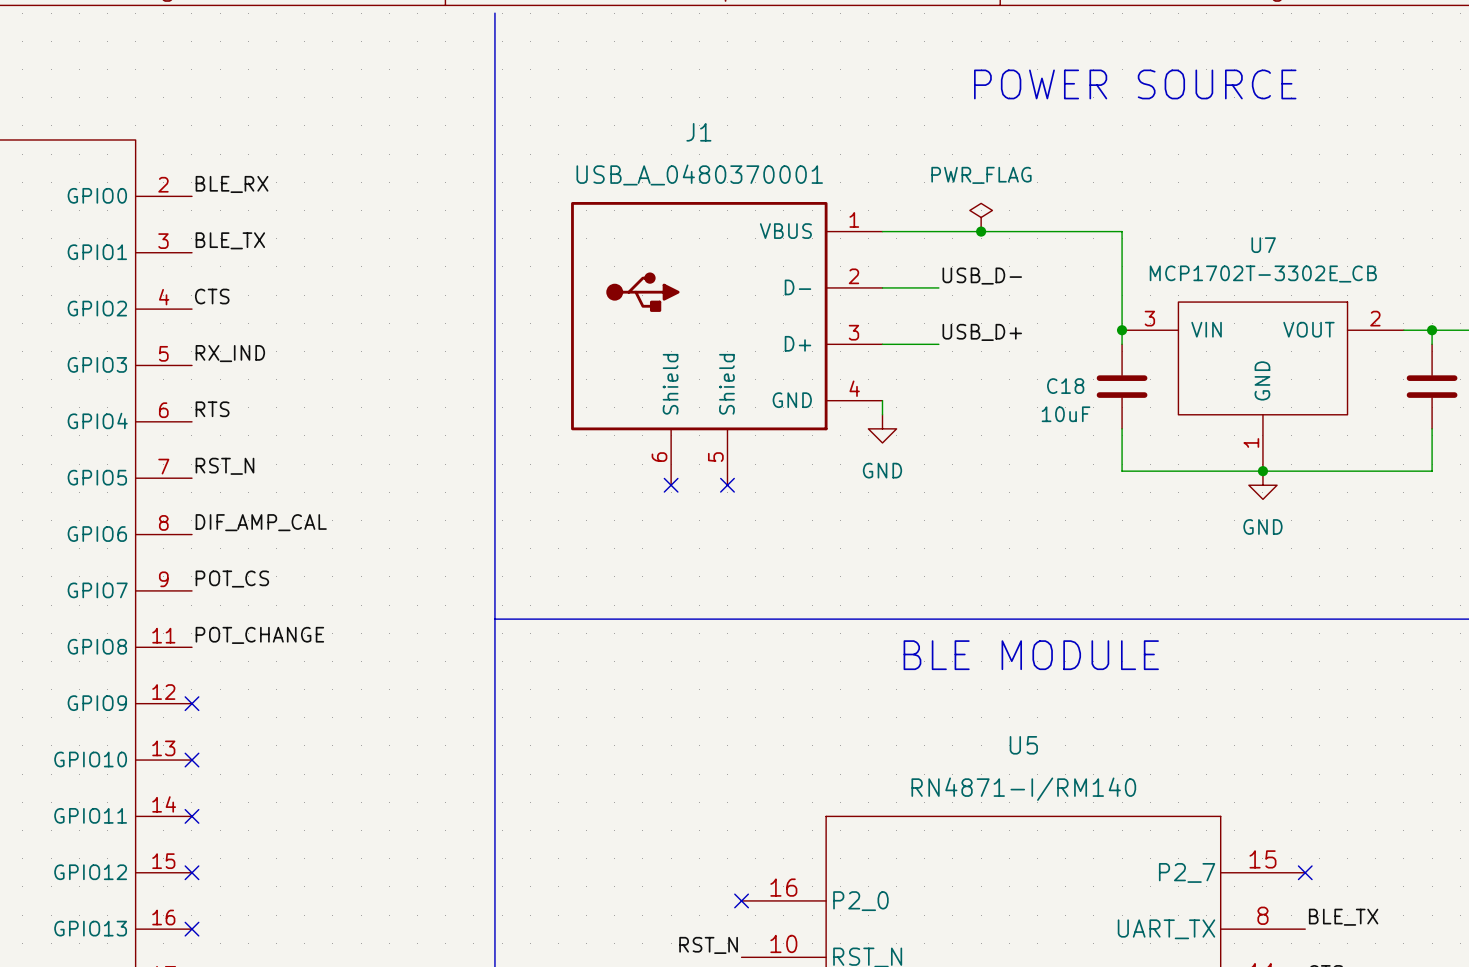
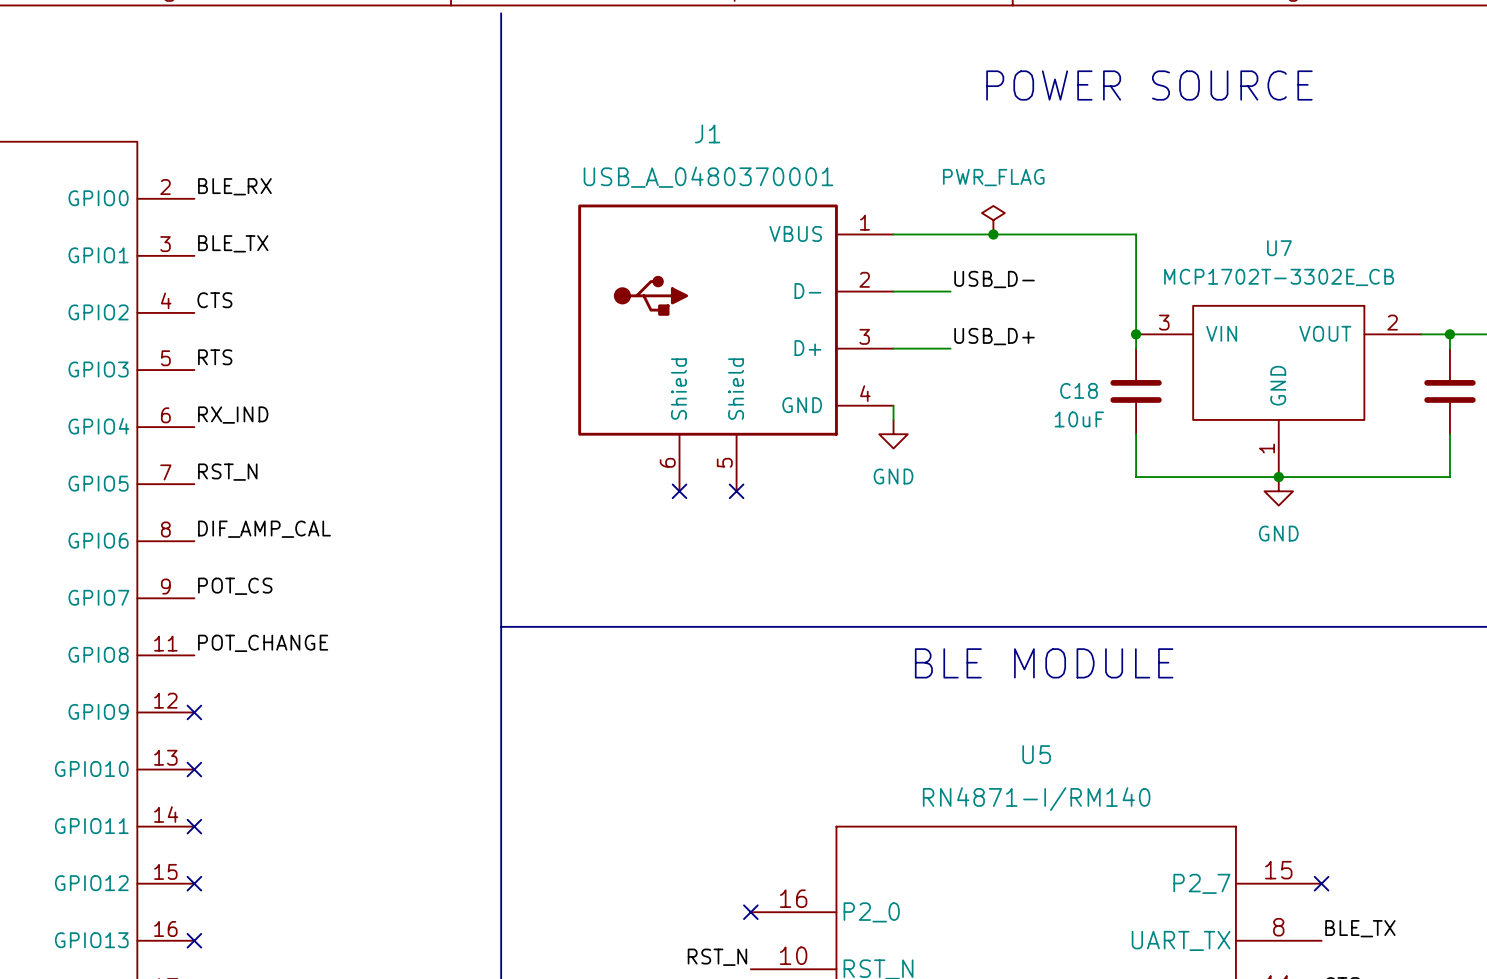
label: RX_IND (230, 353) -> RTS (215, 357)
label: RTS (212, 409) -> RX_IND (233, 415)

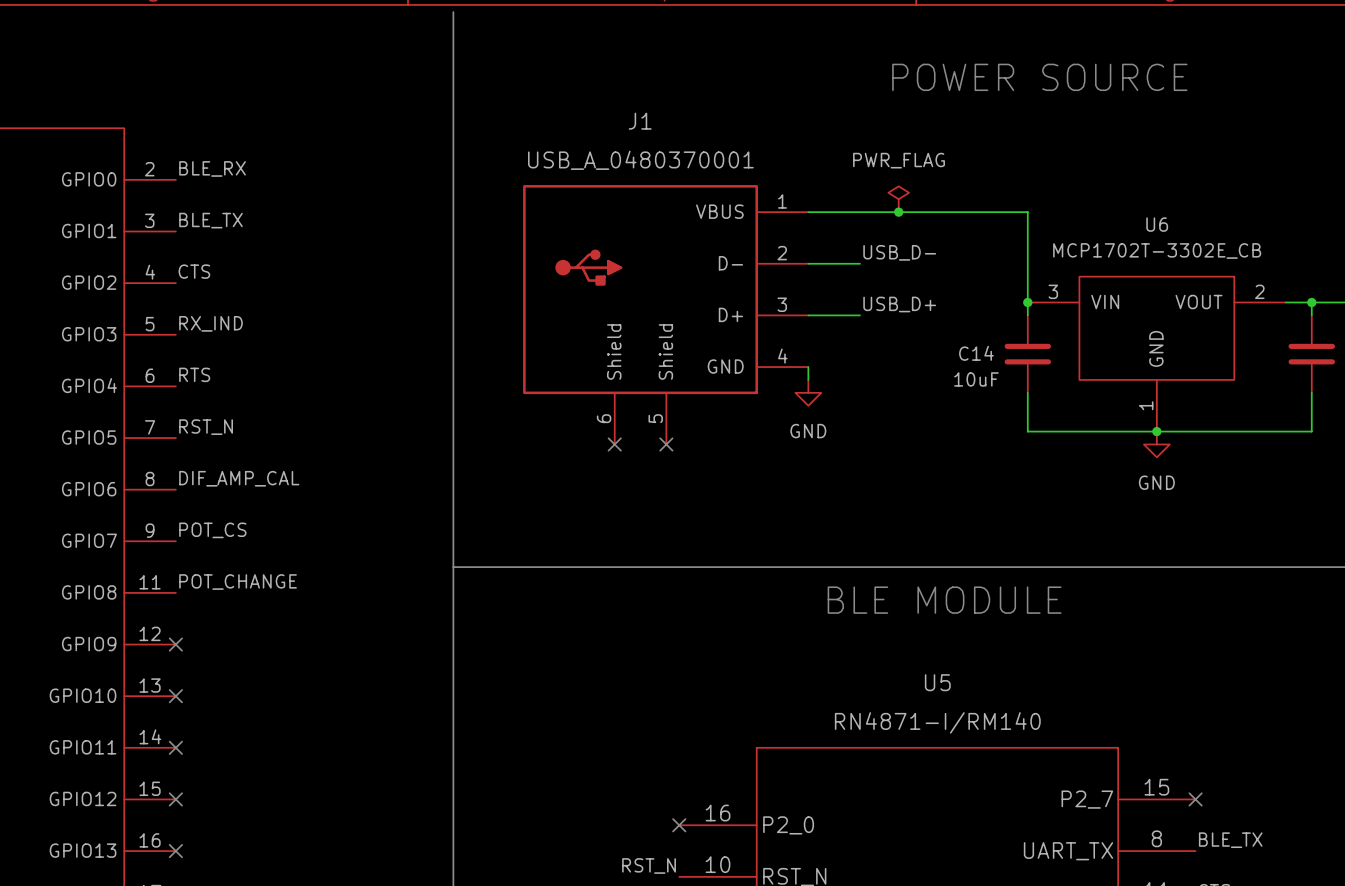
U7 name: U7 (1279, 248) -> U6 (1157, 224)
label: RTS (215, 357) -> RX_IND (210, 323)
C18 name: C18 (1079, 390) -> C14 (976, 353)
label: RX_IND (233, 415) -> RTS (194, 374)

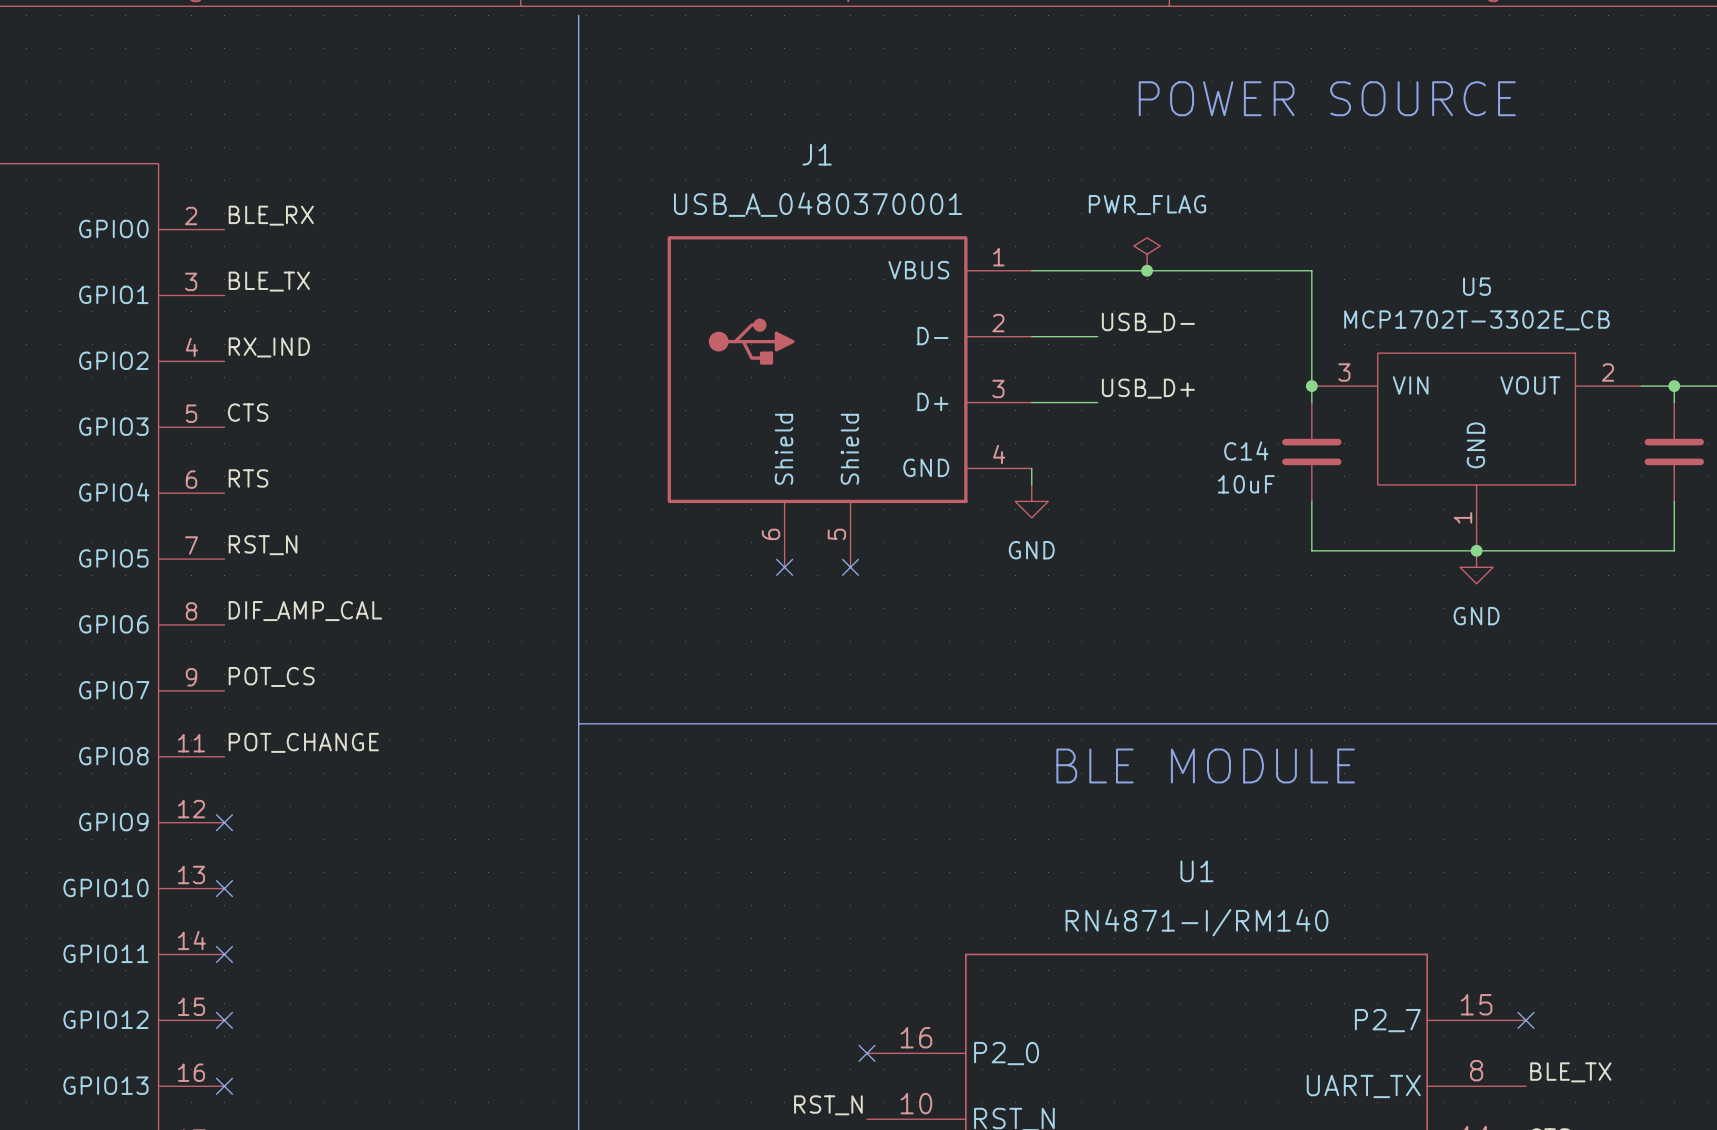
U6 name: U6 (1157, 224) -> U5 (1476, 286)
label: CTS (194, 271) -> RX_IND (269, 347)
label: RX_IND (210, 323) -> CTS (248, 412)
U5 name: U5 (937, 682) -> U1 (1196, 871)

